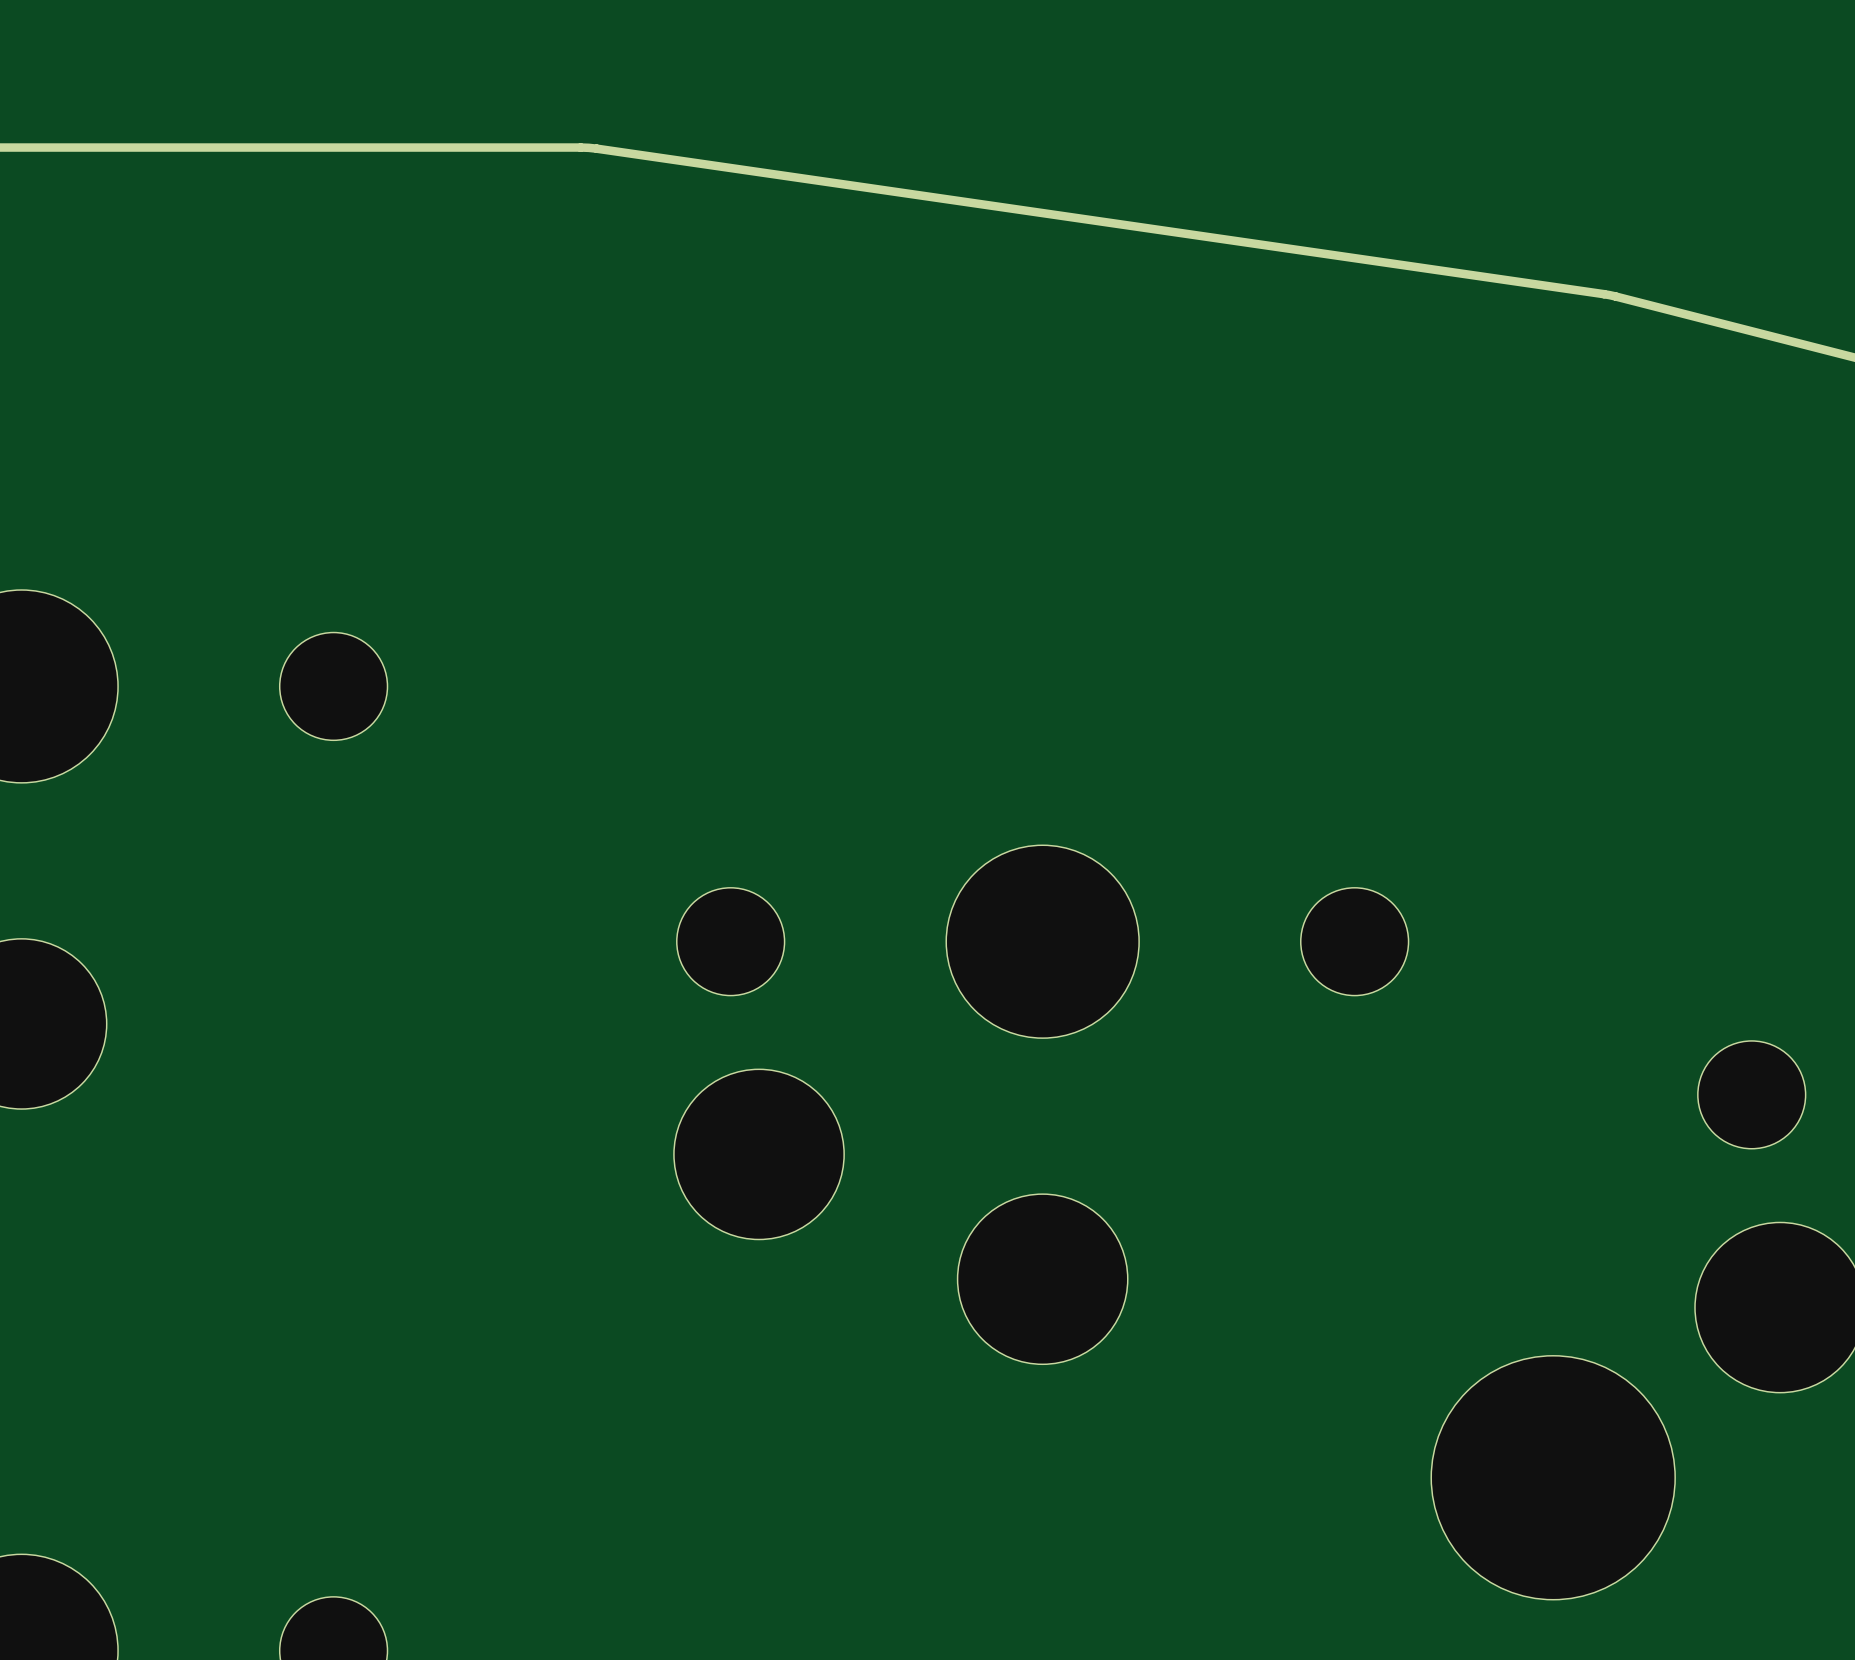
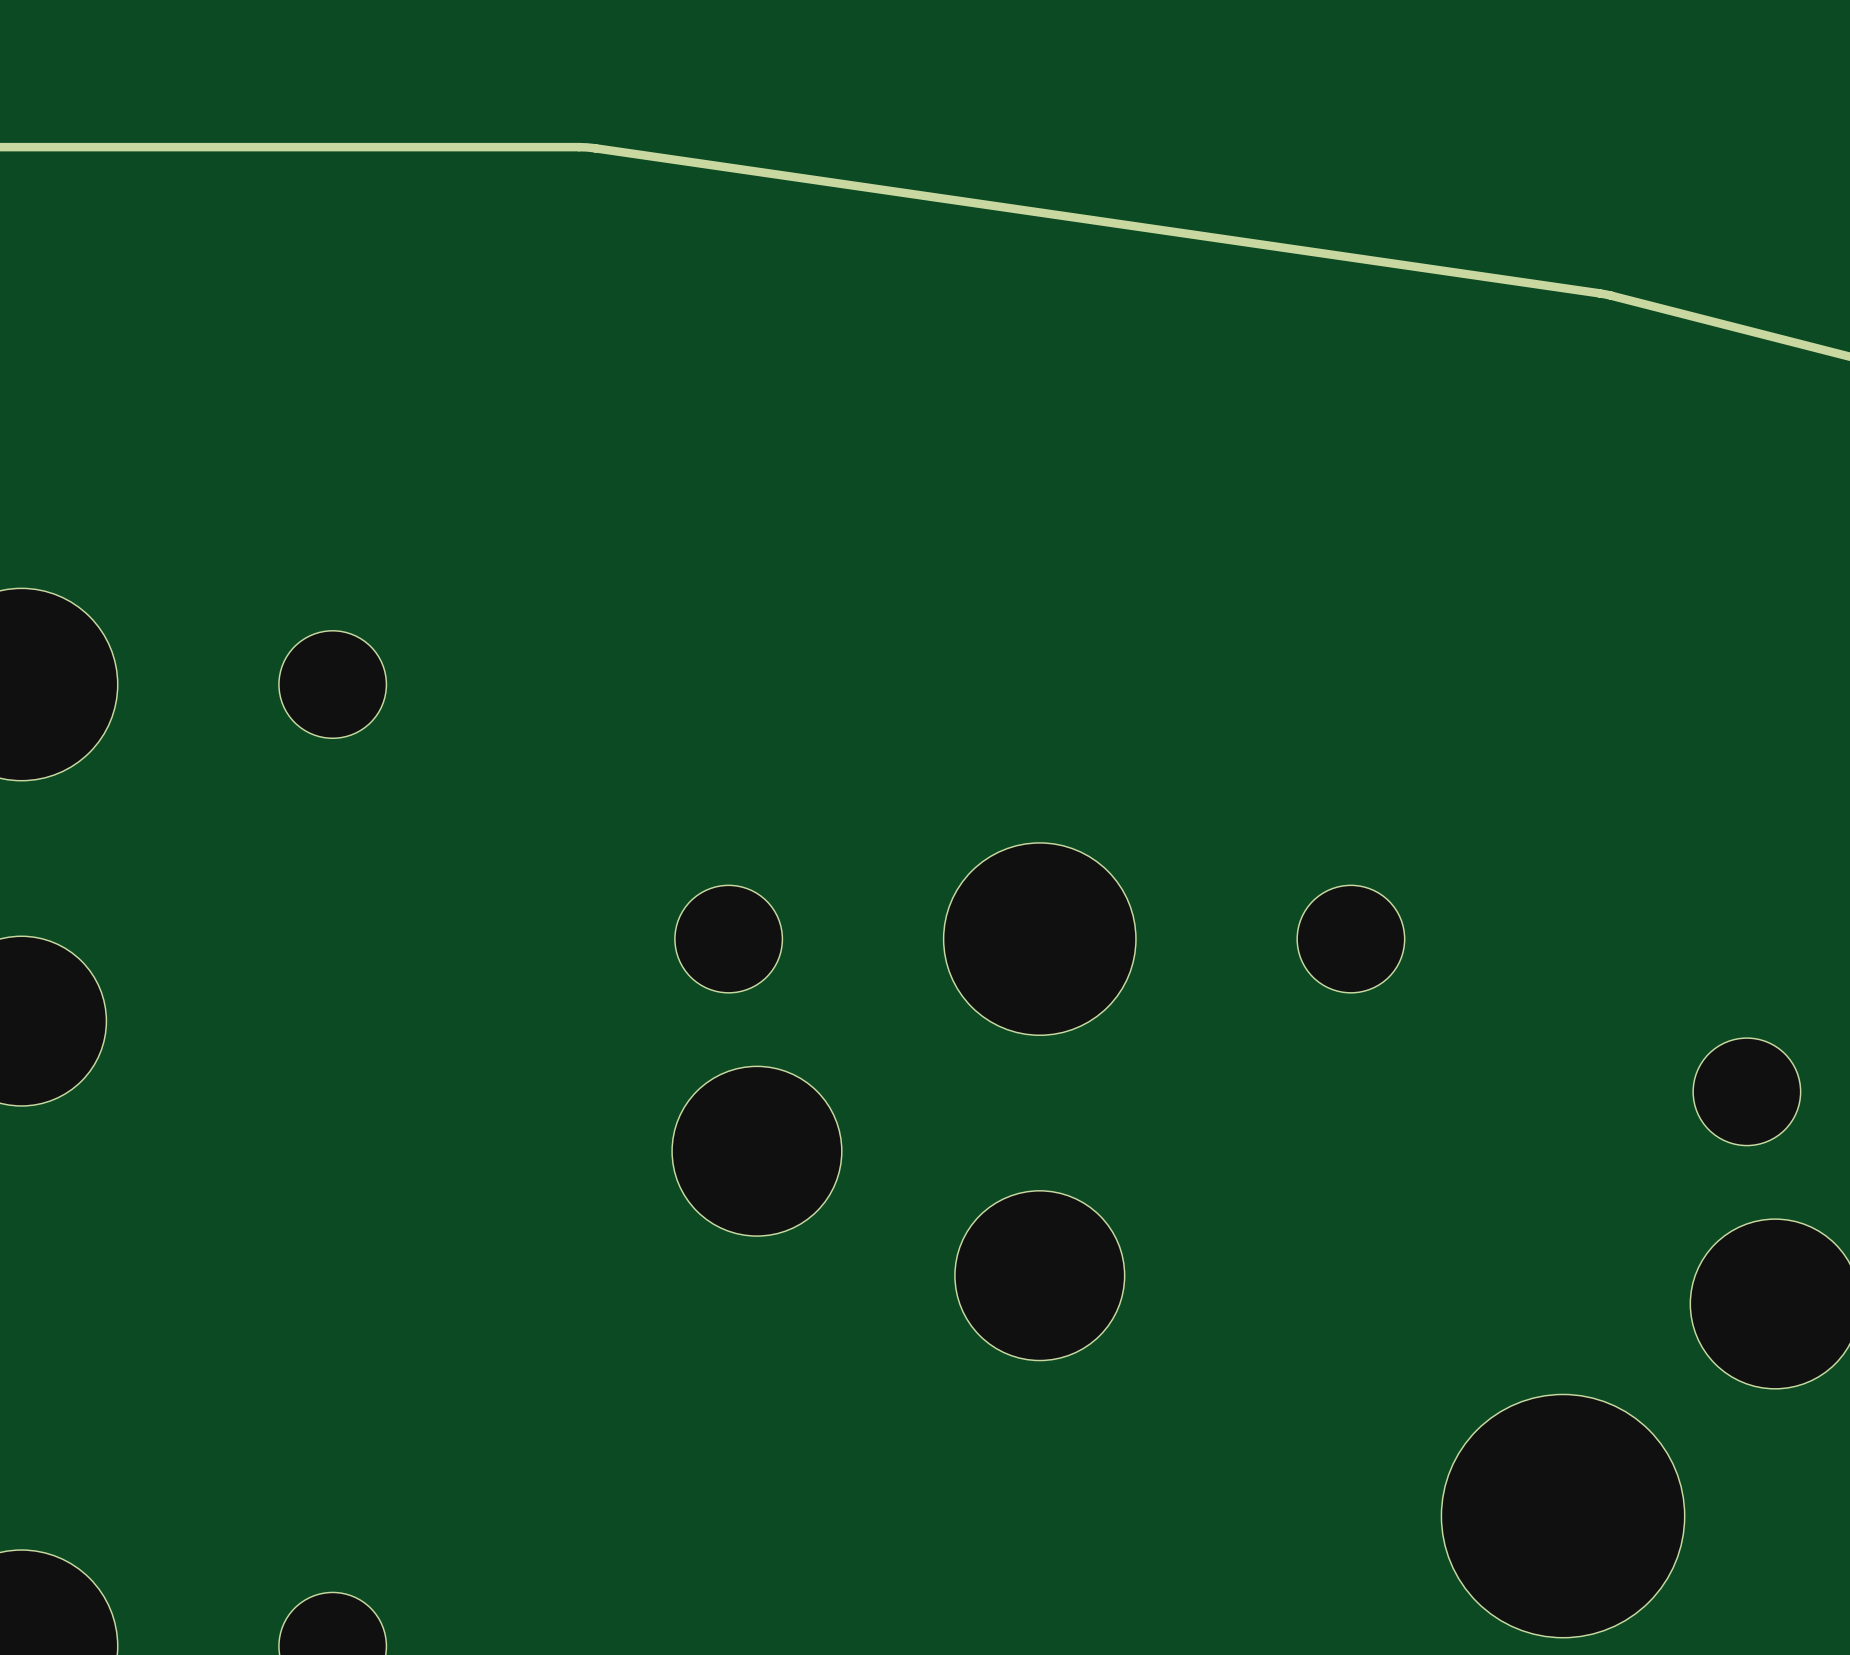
part position: (1553, 1477) -> (1563, 1516)

